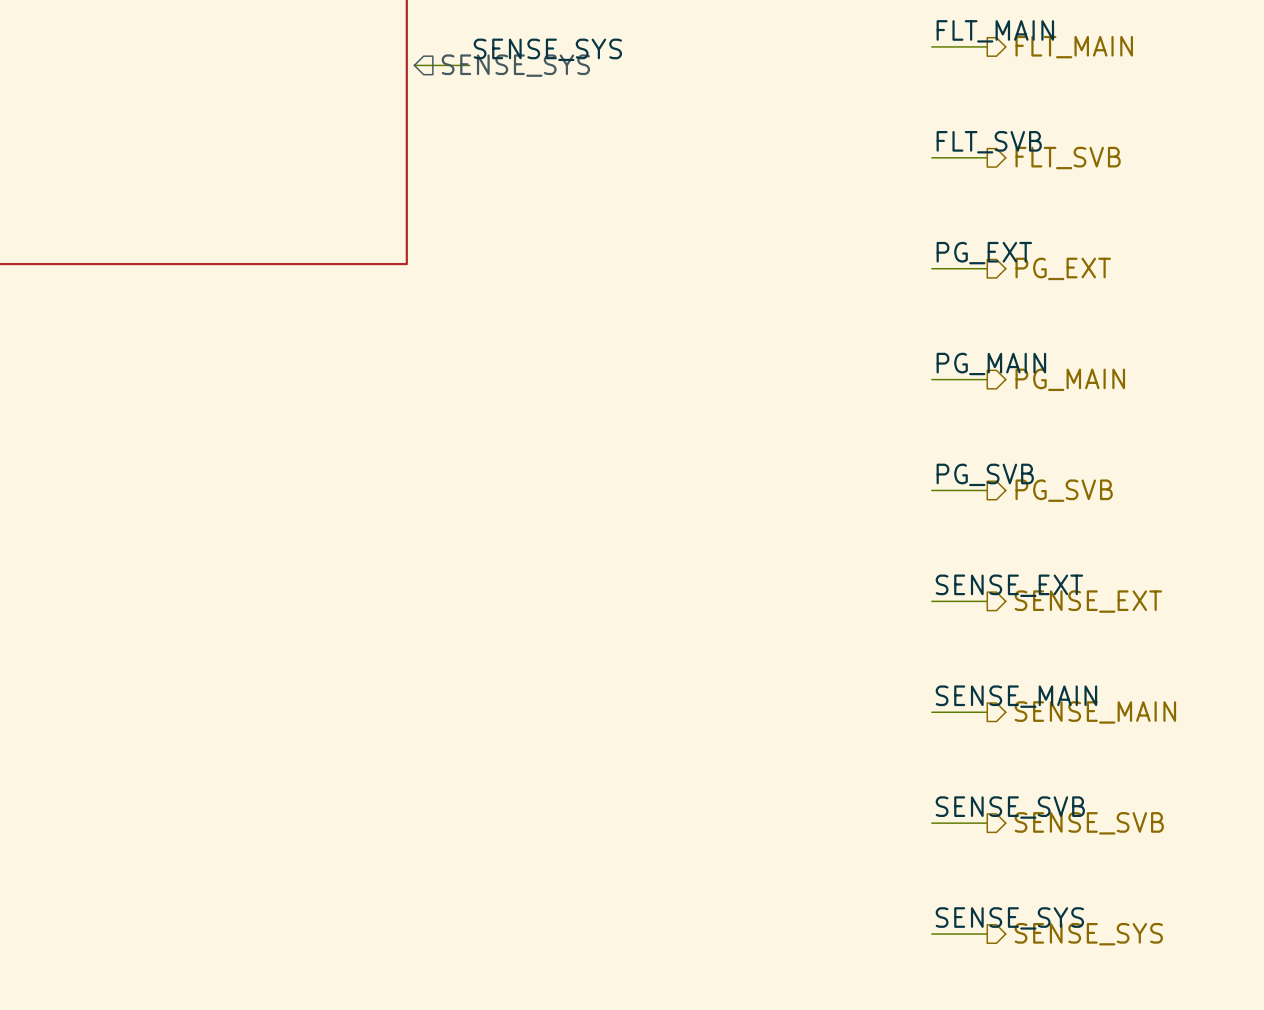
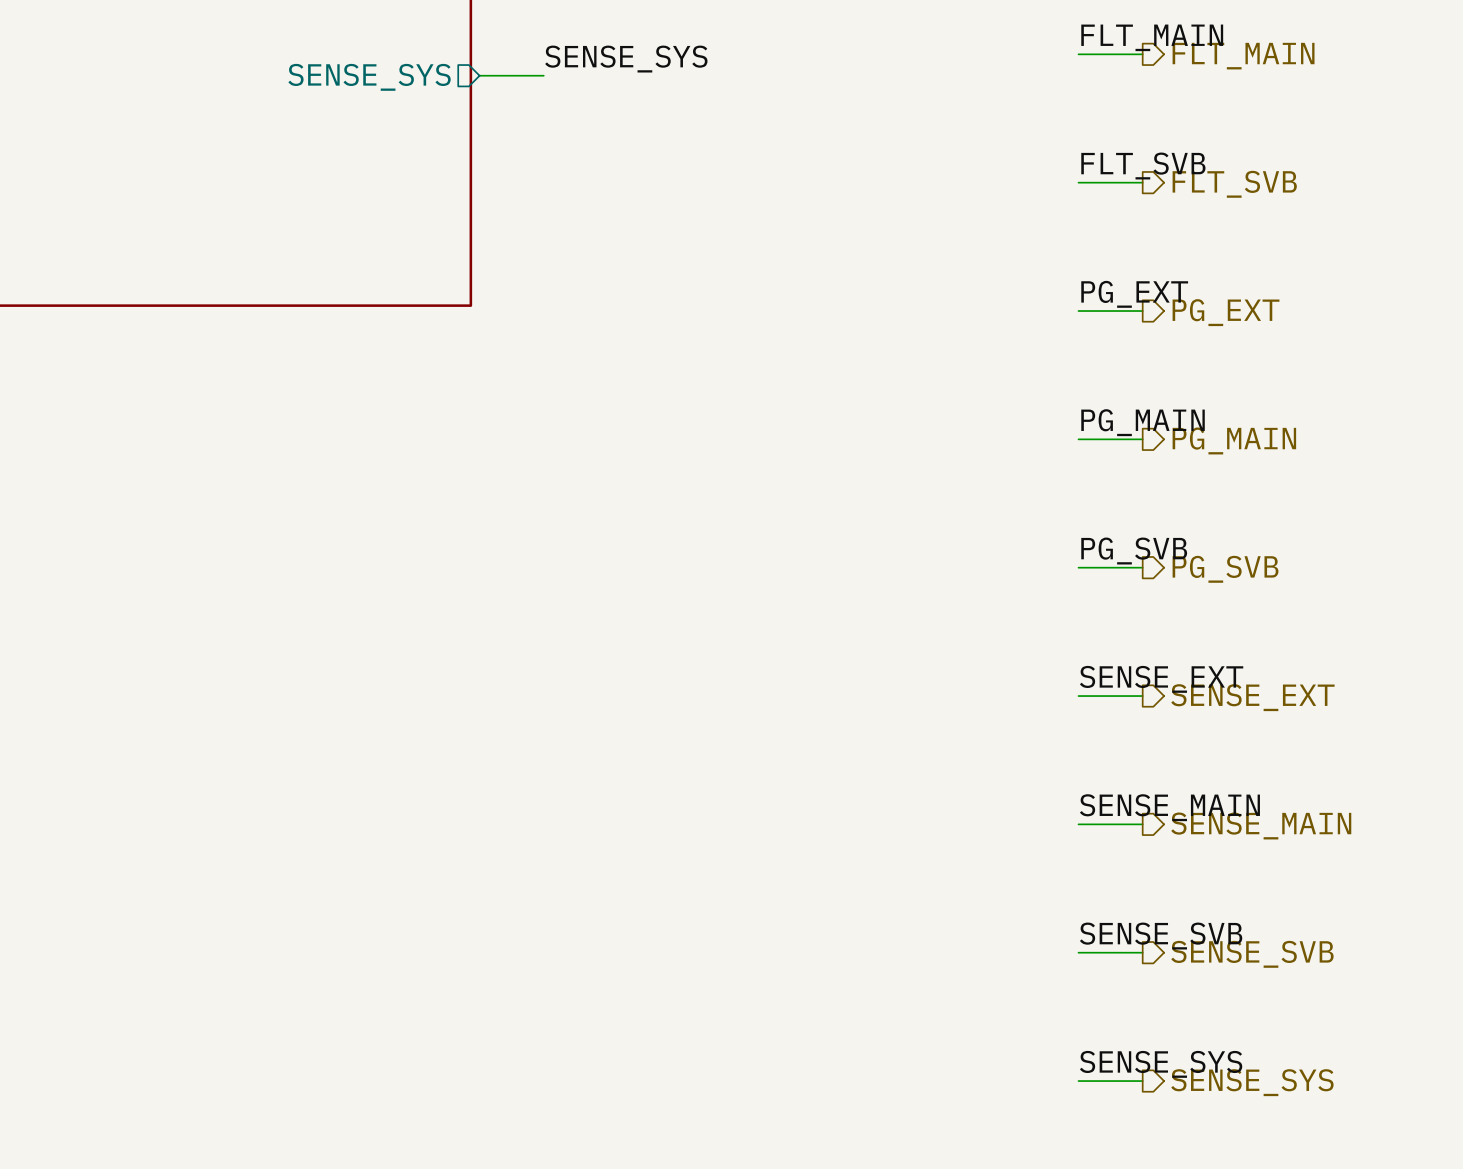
sheet pin rotation: 0° (515, 65) -> 180° (369, 77)
sheet pin position: SENSE_SYS (515, 65) -> SENSE_SYS (369, 77)

